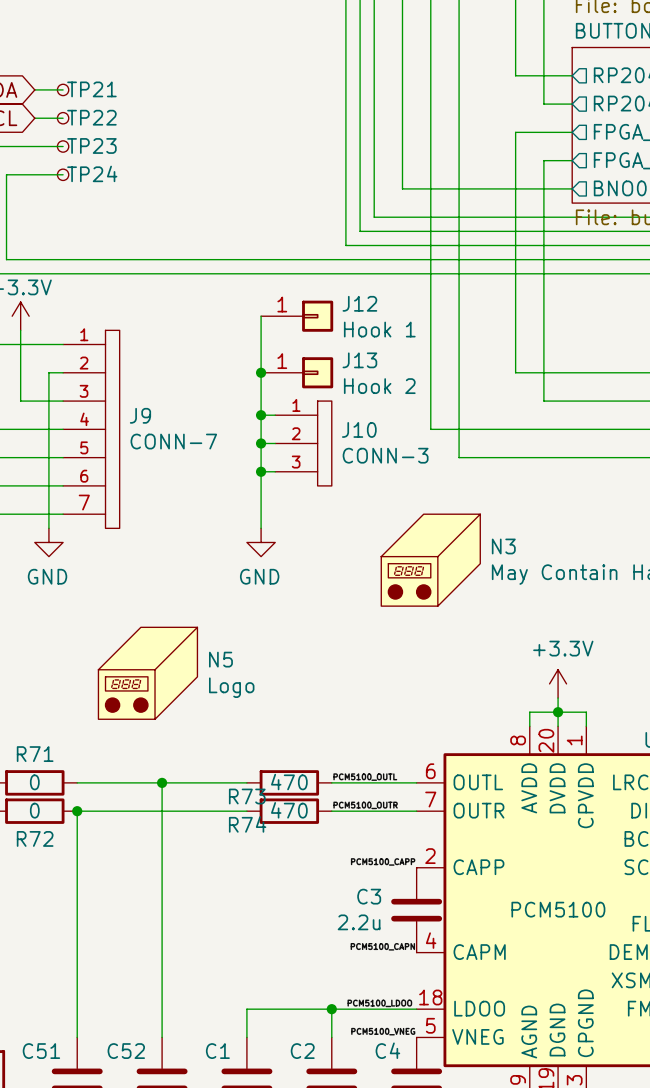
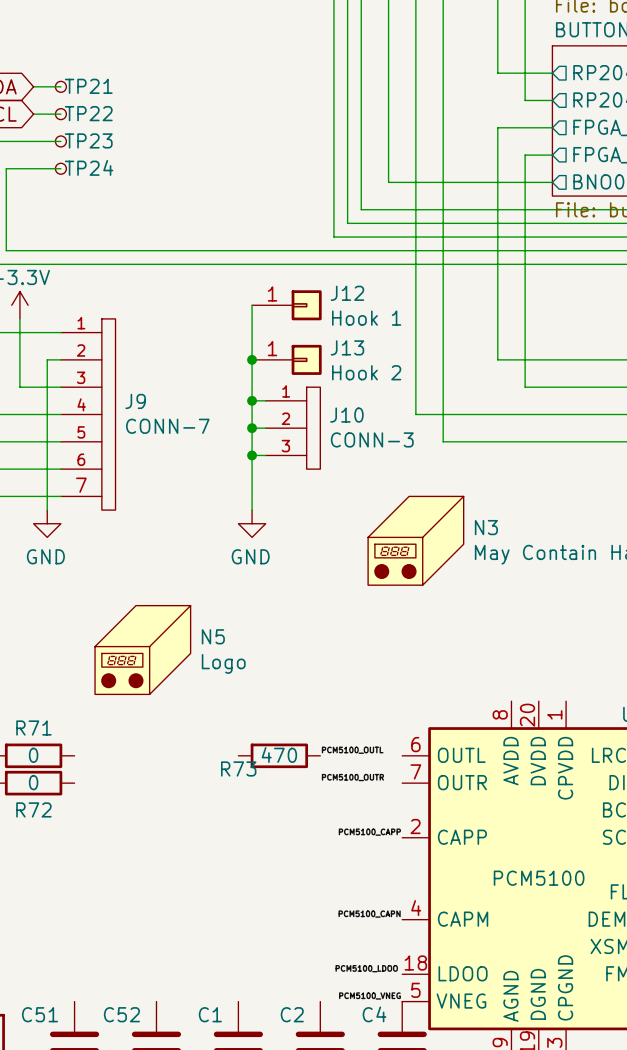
power symbol: +3.3V (558, 683) -> none
wire: (558, 698) (558, 726) -> none
junction: (558, 712) -> none
wire: (529, 726) (529, 712) (586, 712) (586, 726) -> none
wire: (77, 782) (246, 782) -> none
wire: (162, 782) (162, 1037) -> none
junction: (162, 782) -> none
wire: (331, 782) (416, 782) -> none
junction: (77, 811) -> none
wire: (246, 811) (77, 811) (77, 1037) -> none
R74: 470 (289, 811) -> none
wire: (331, 811) (416, 811) -> none
C3: 2.2u (416, 910) -> none
wire: (331, 1009) (331, 1037) -> none
junction: (331, 1009) -> none
wire: (416, 1009) (246, 1009) (246, 1037) -> none

